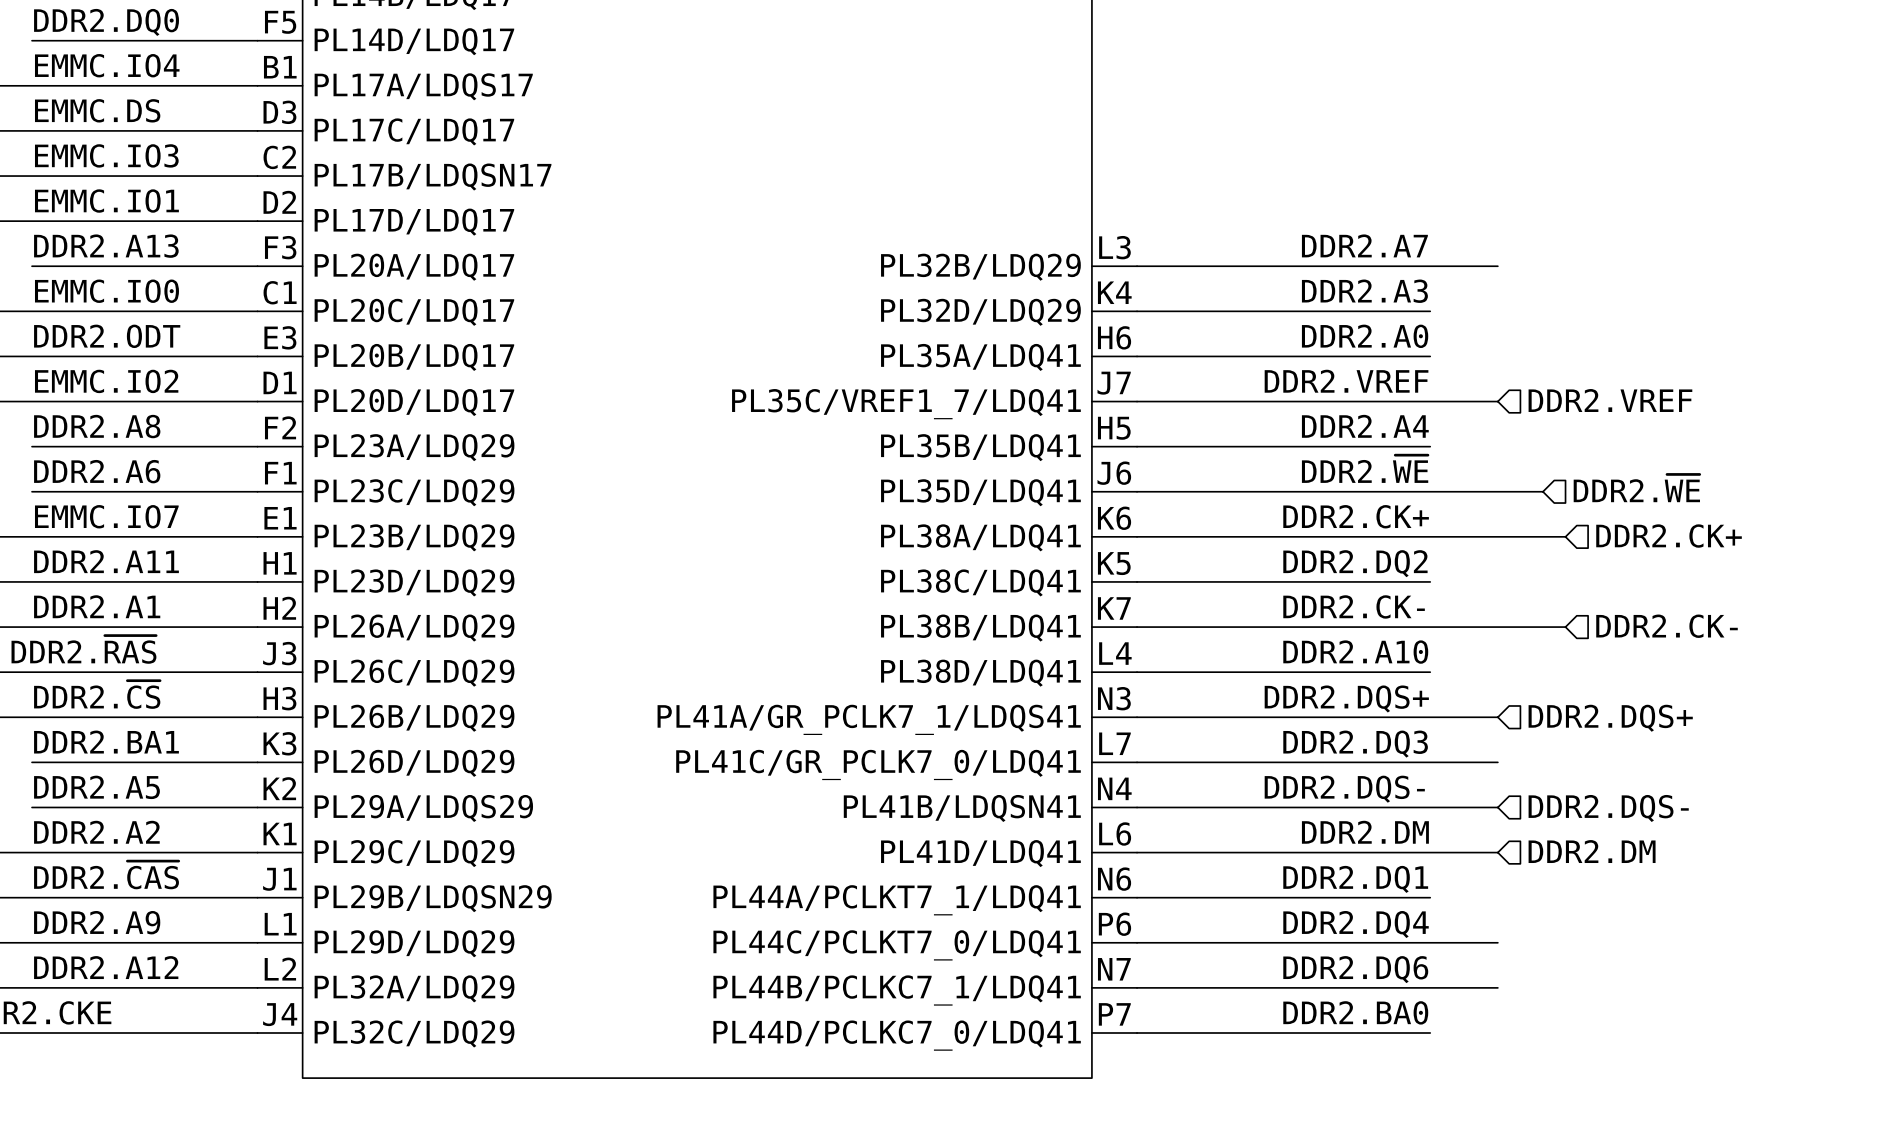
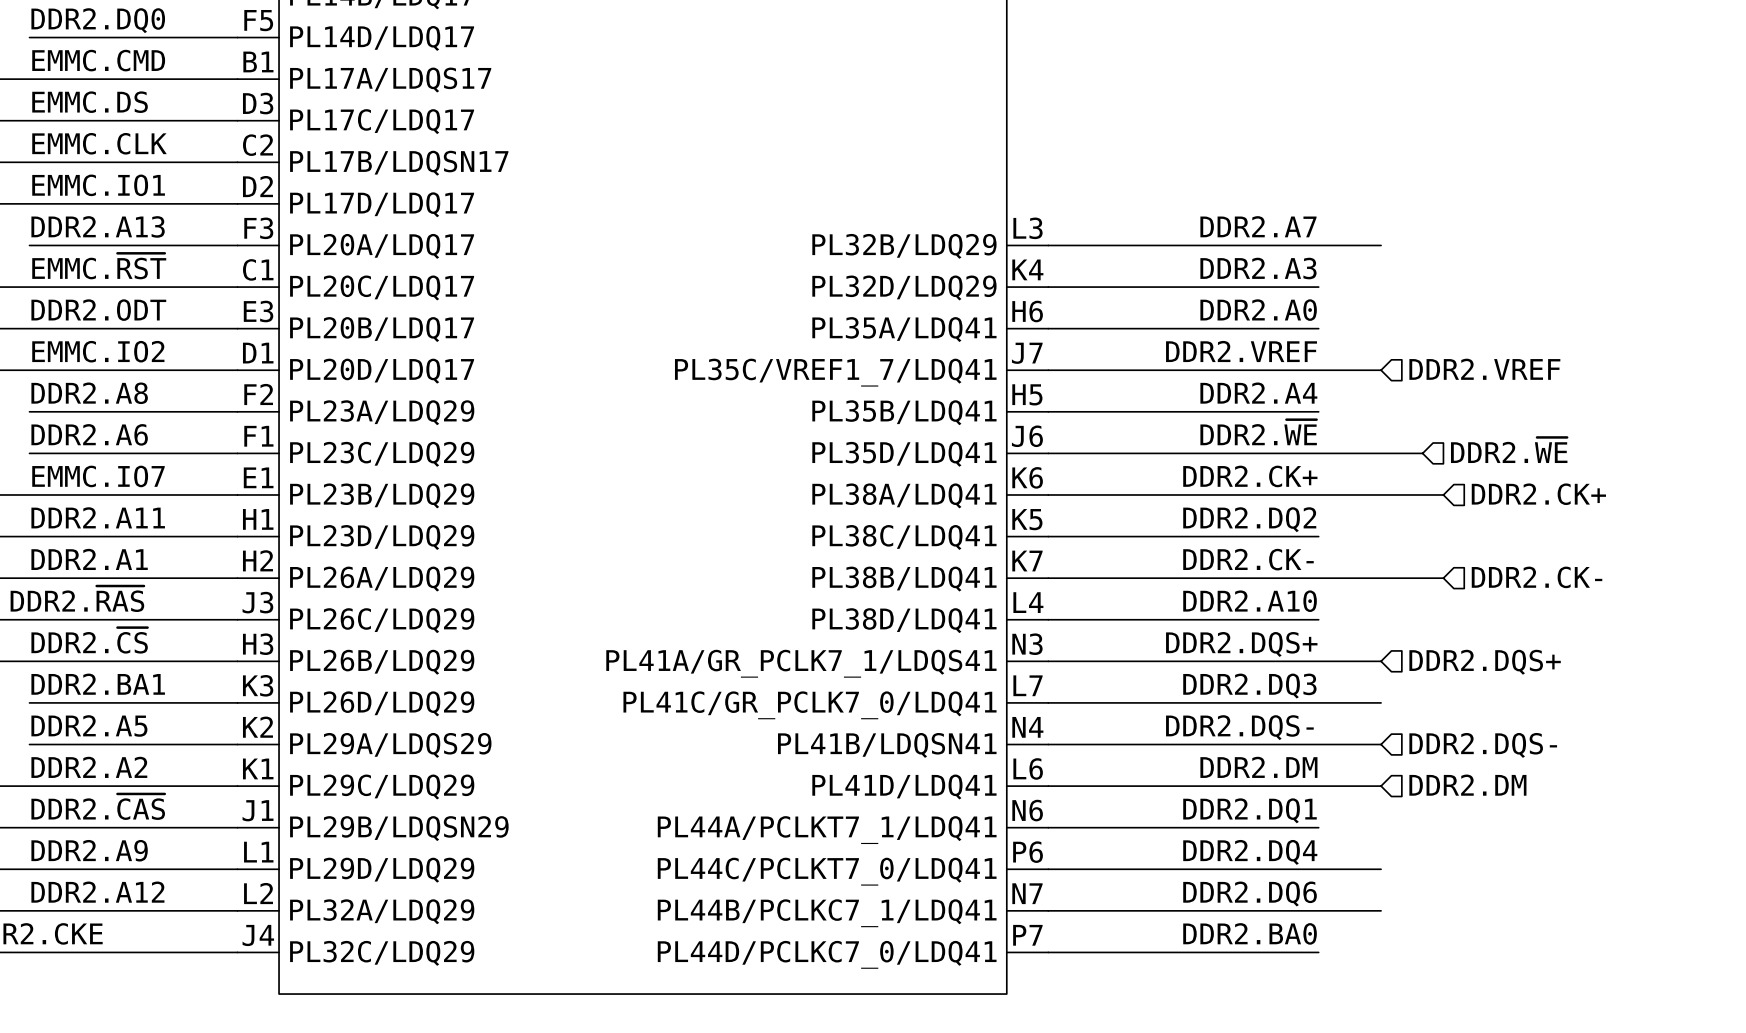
label: EMMC.IO4 (107, 65) -> EMMC.CMD (98, 60)
label: EMMC.IO3 (106, 155) -> EMMC.CLK (99, 143)
label: EMMC.IO0 (106, 291) -> EMMC.~{RST} (99, 266)

